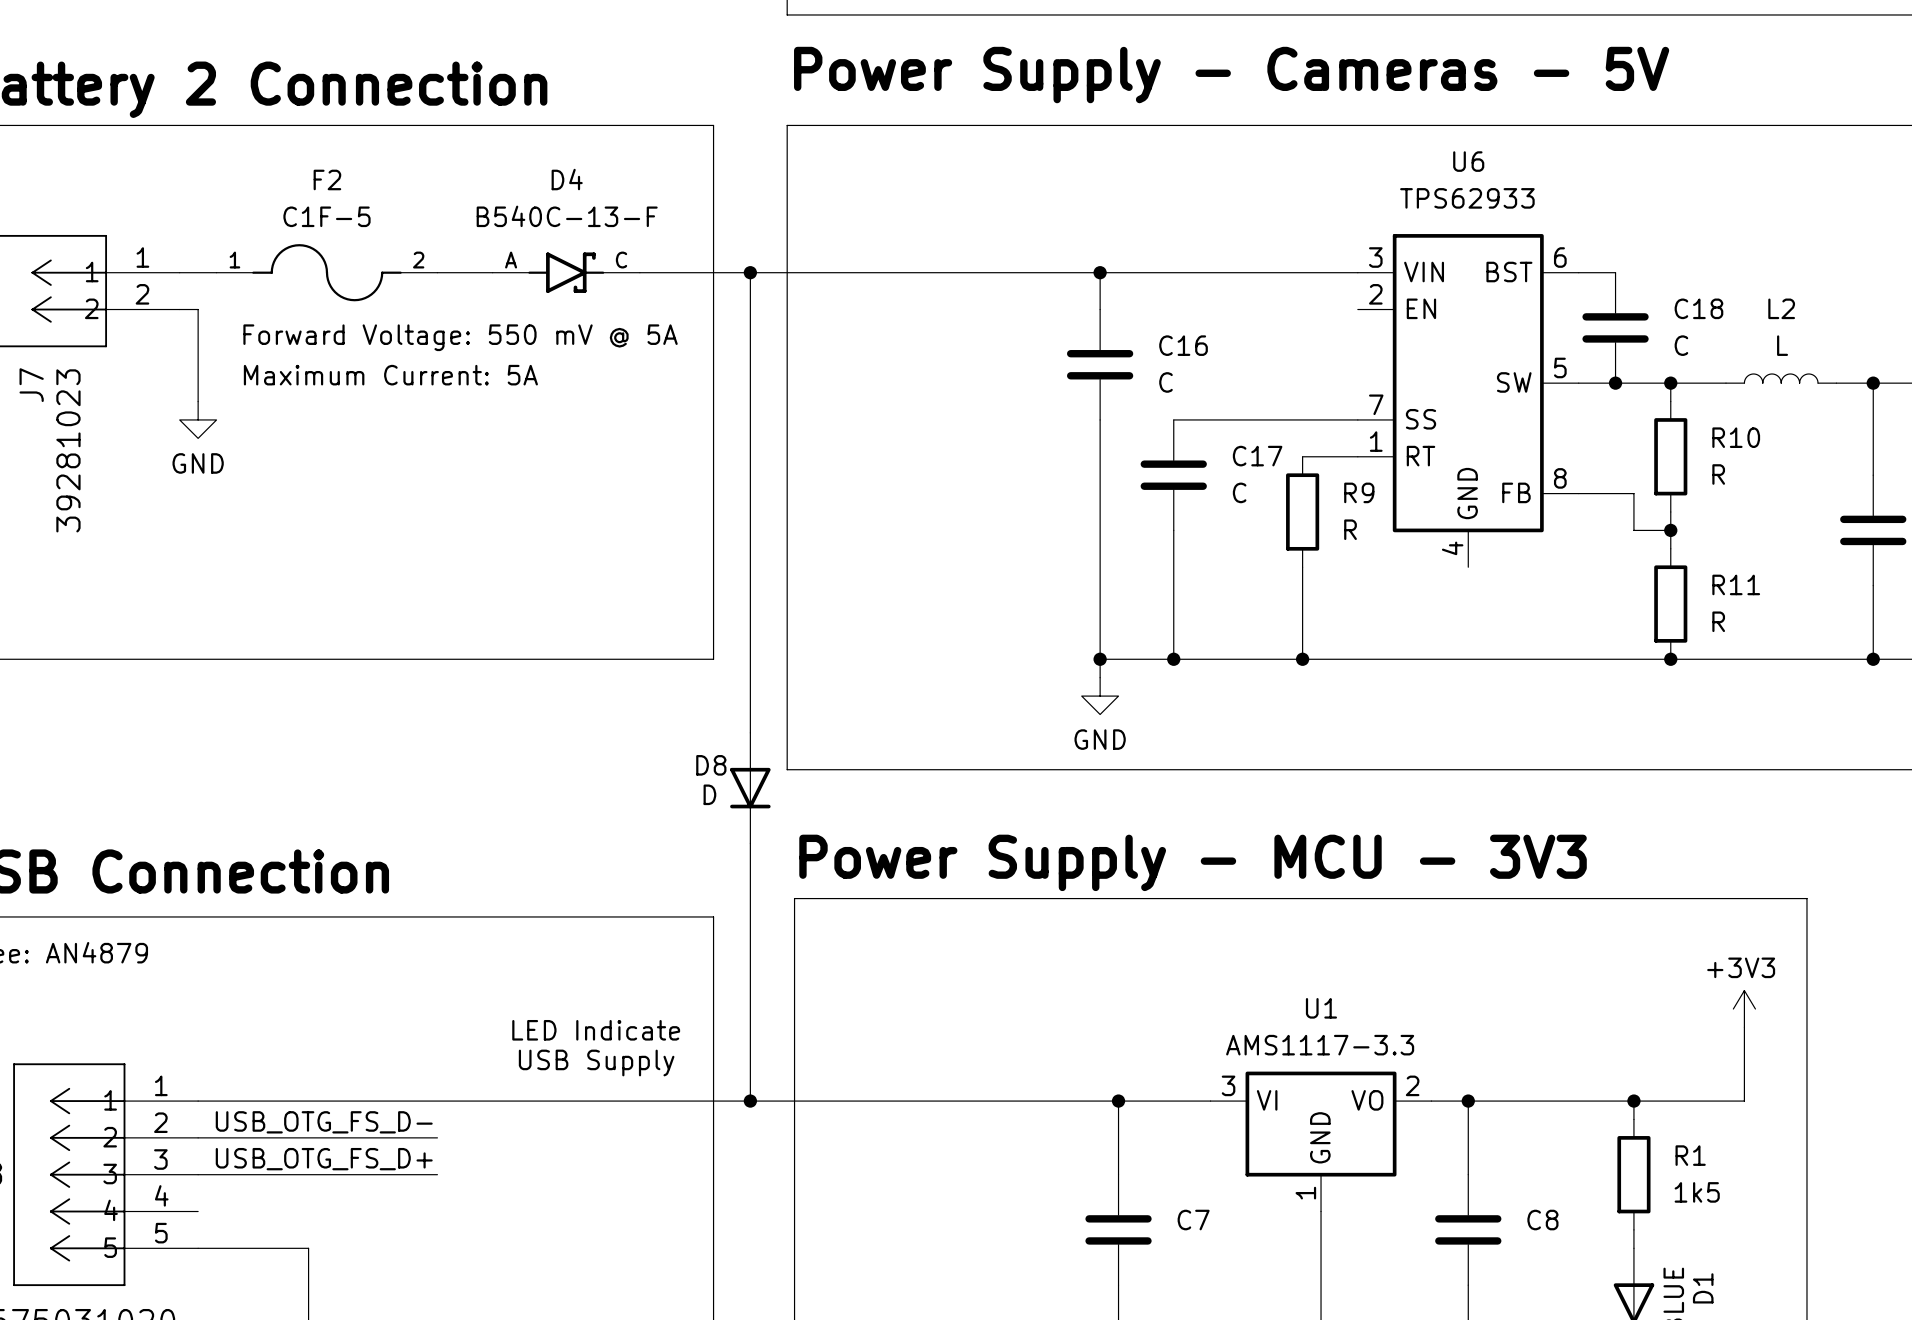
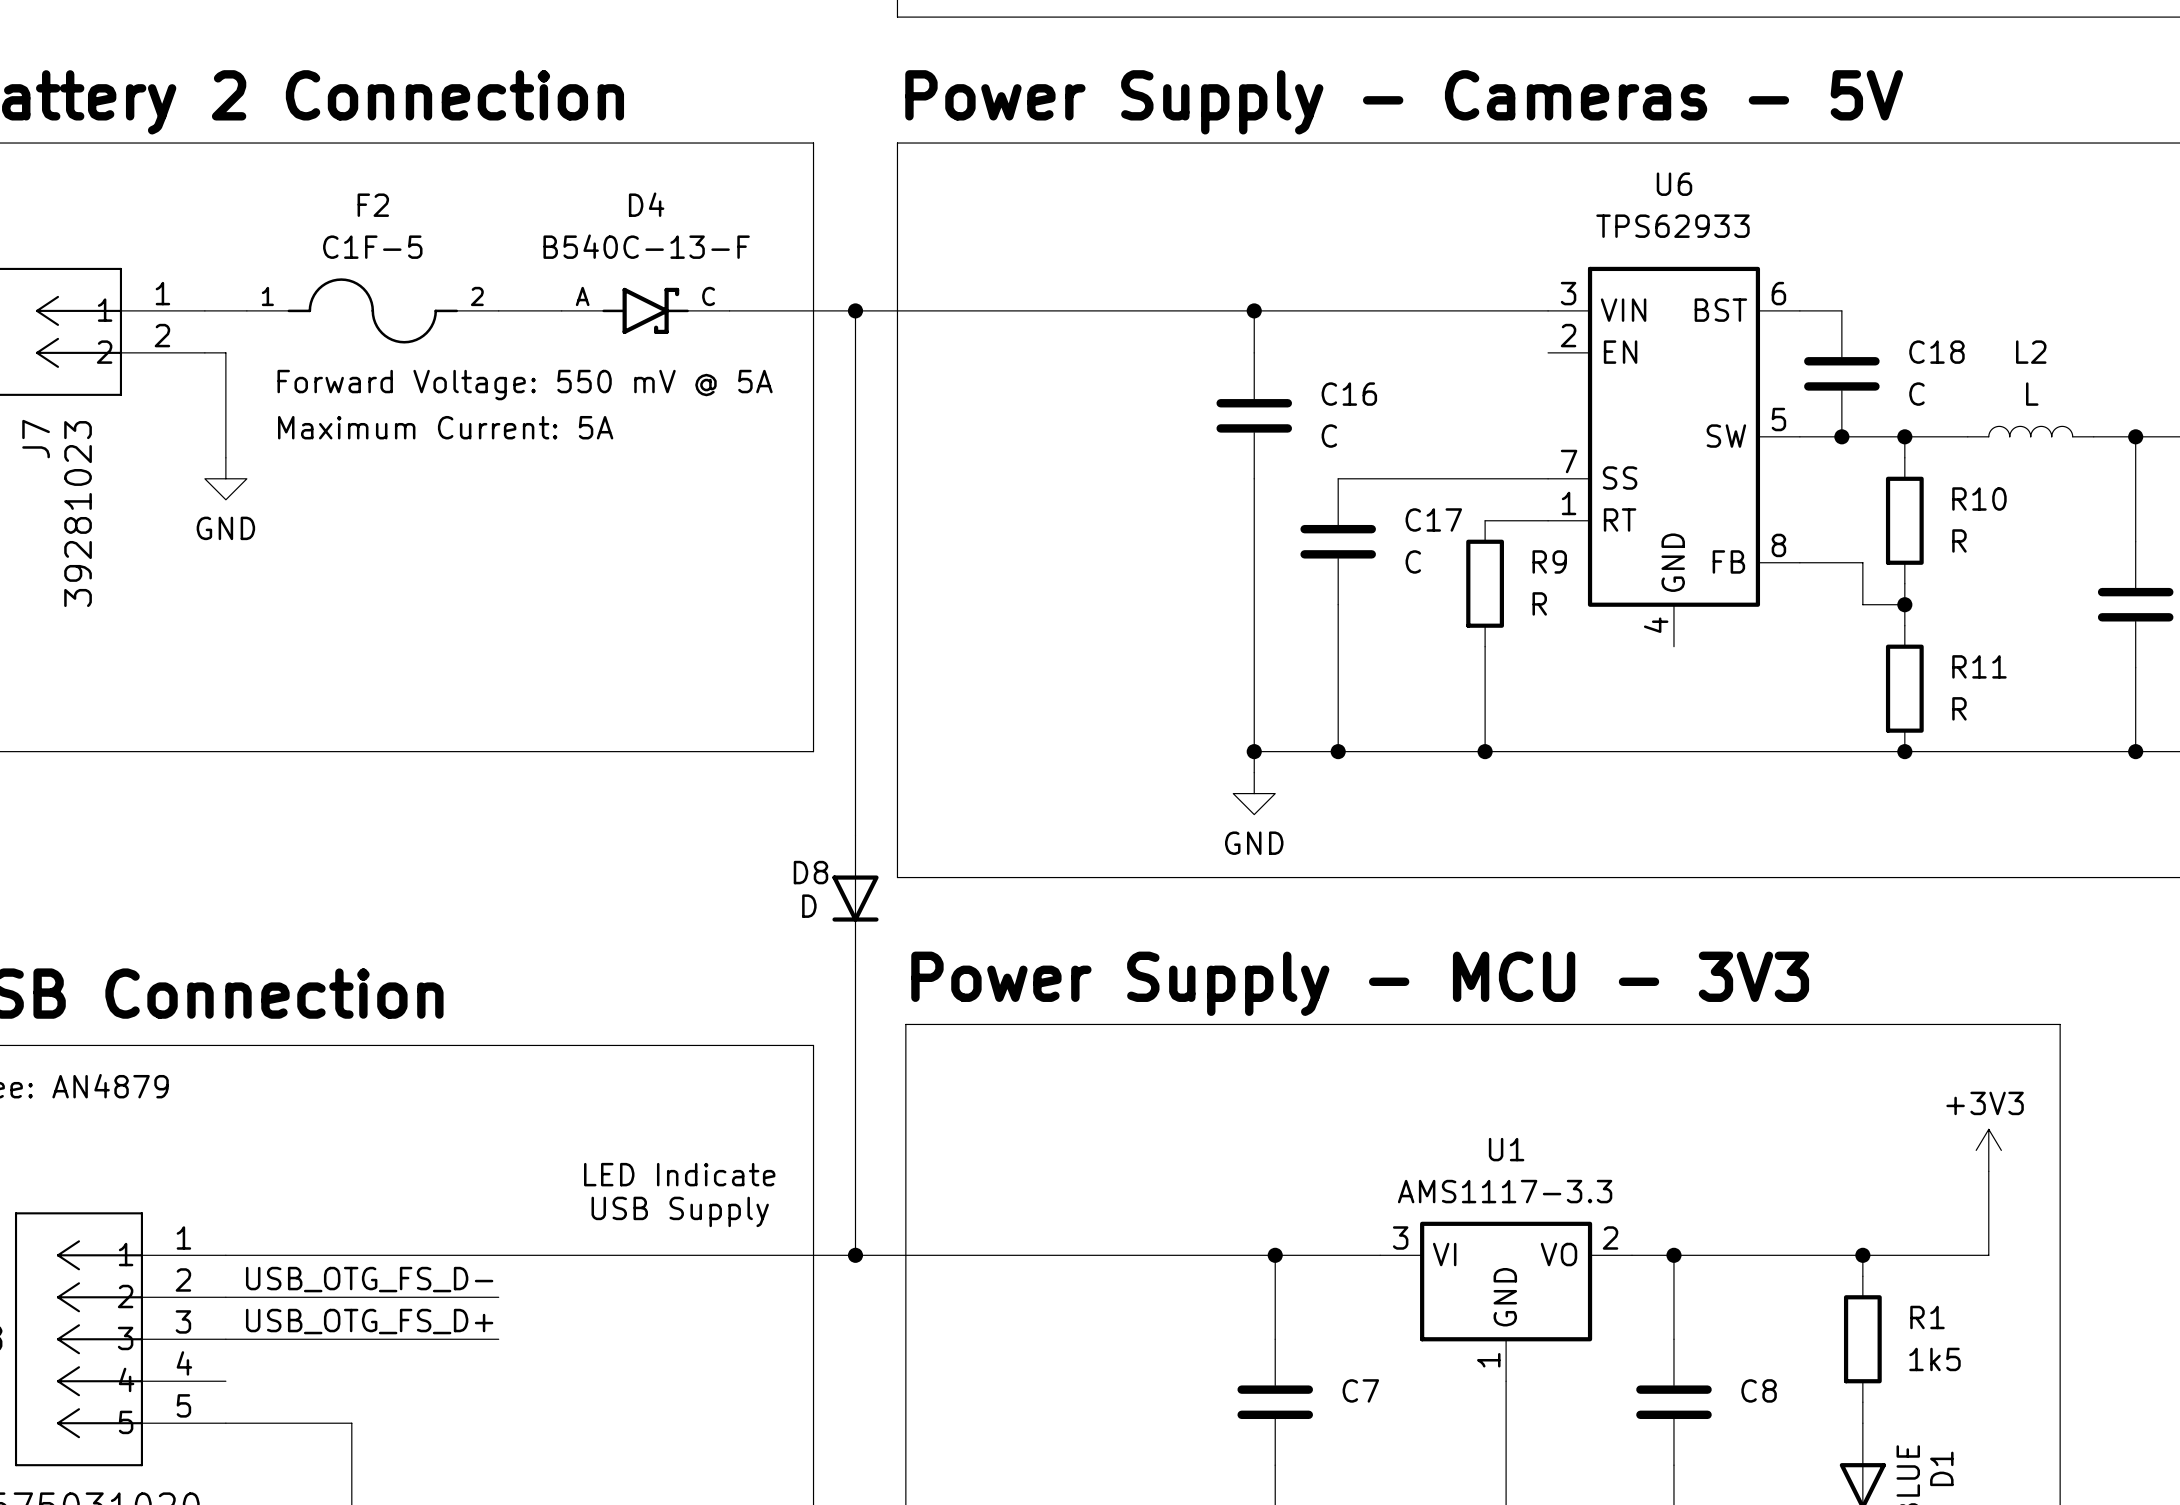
text position: Power Supply - Cameras - 5V (1231, 75) -> Power Supply - Cameras - 5V (1404, 102)

